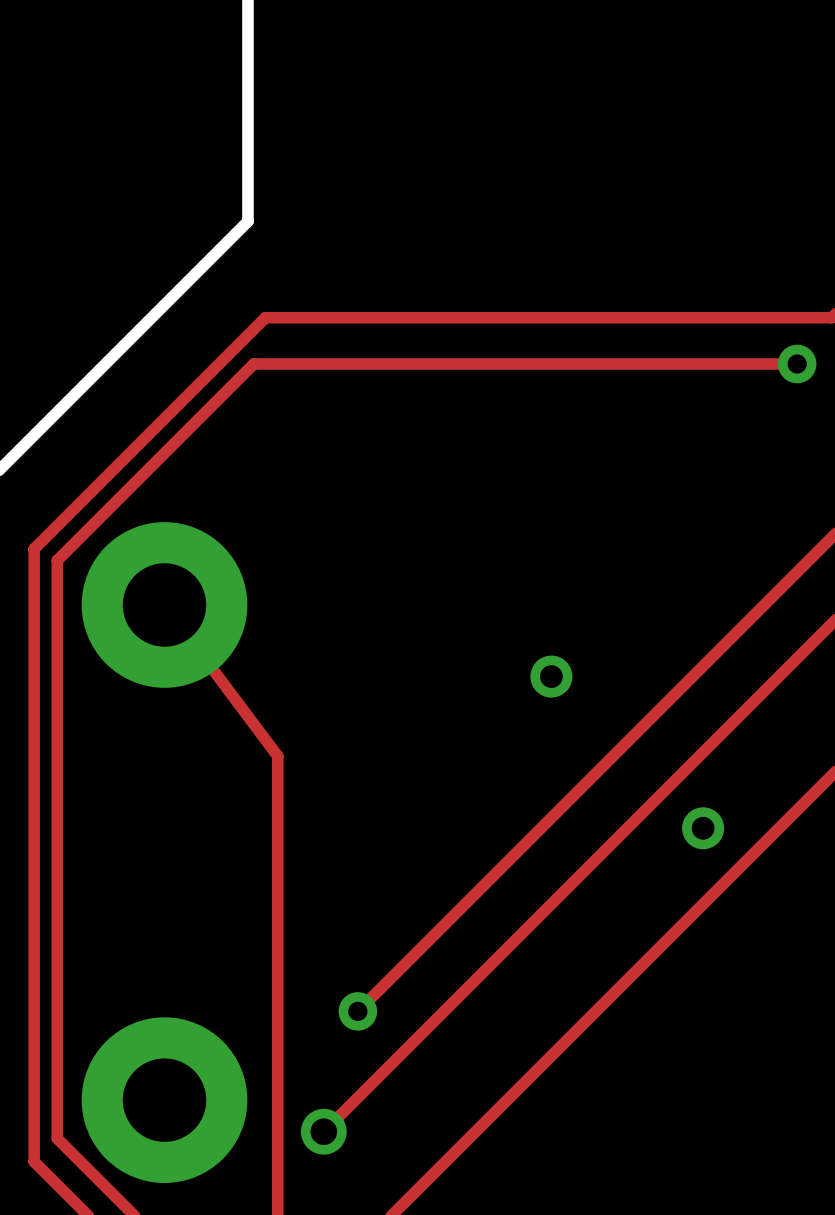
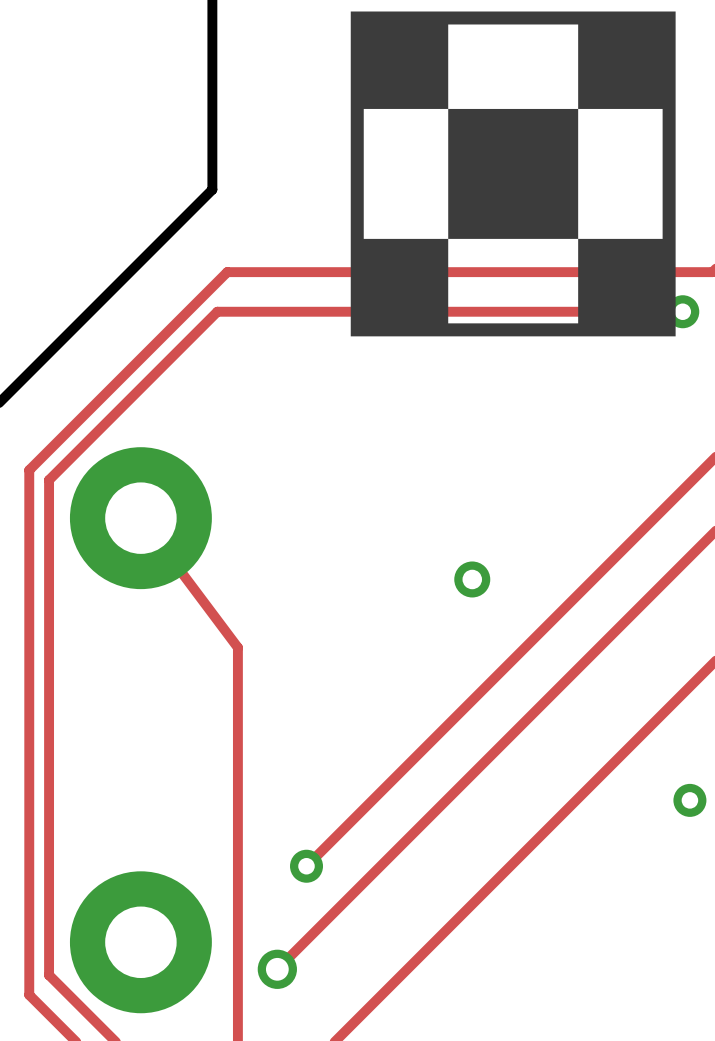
drawing: none -> [350, 11, 676, 337]
via: (703, 828) -> none
via: none -> (689, 800)

